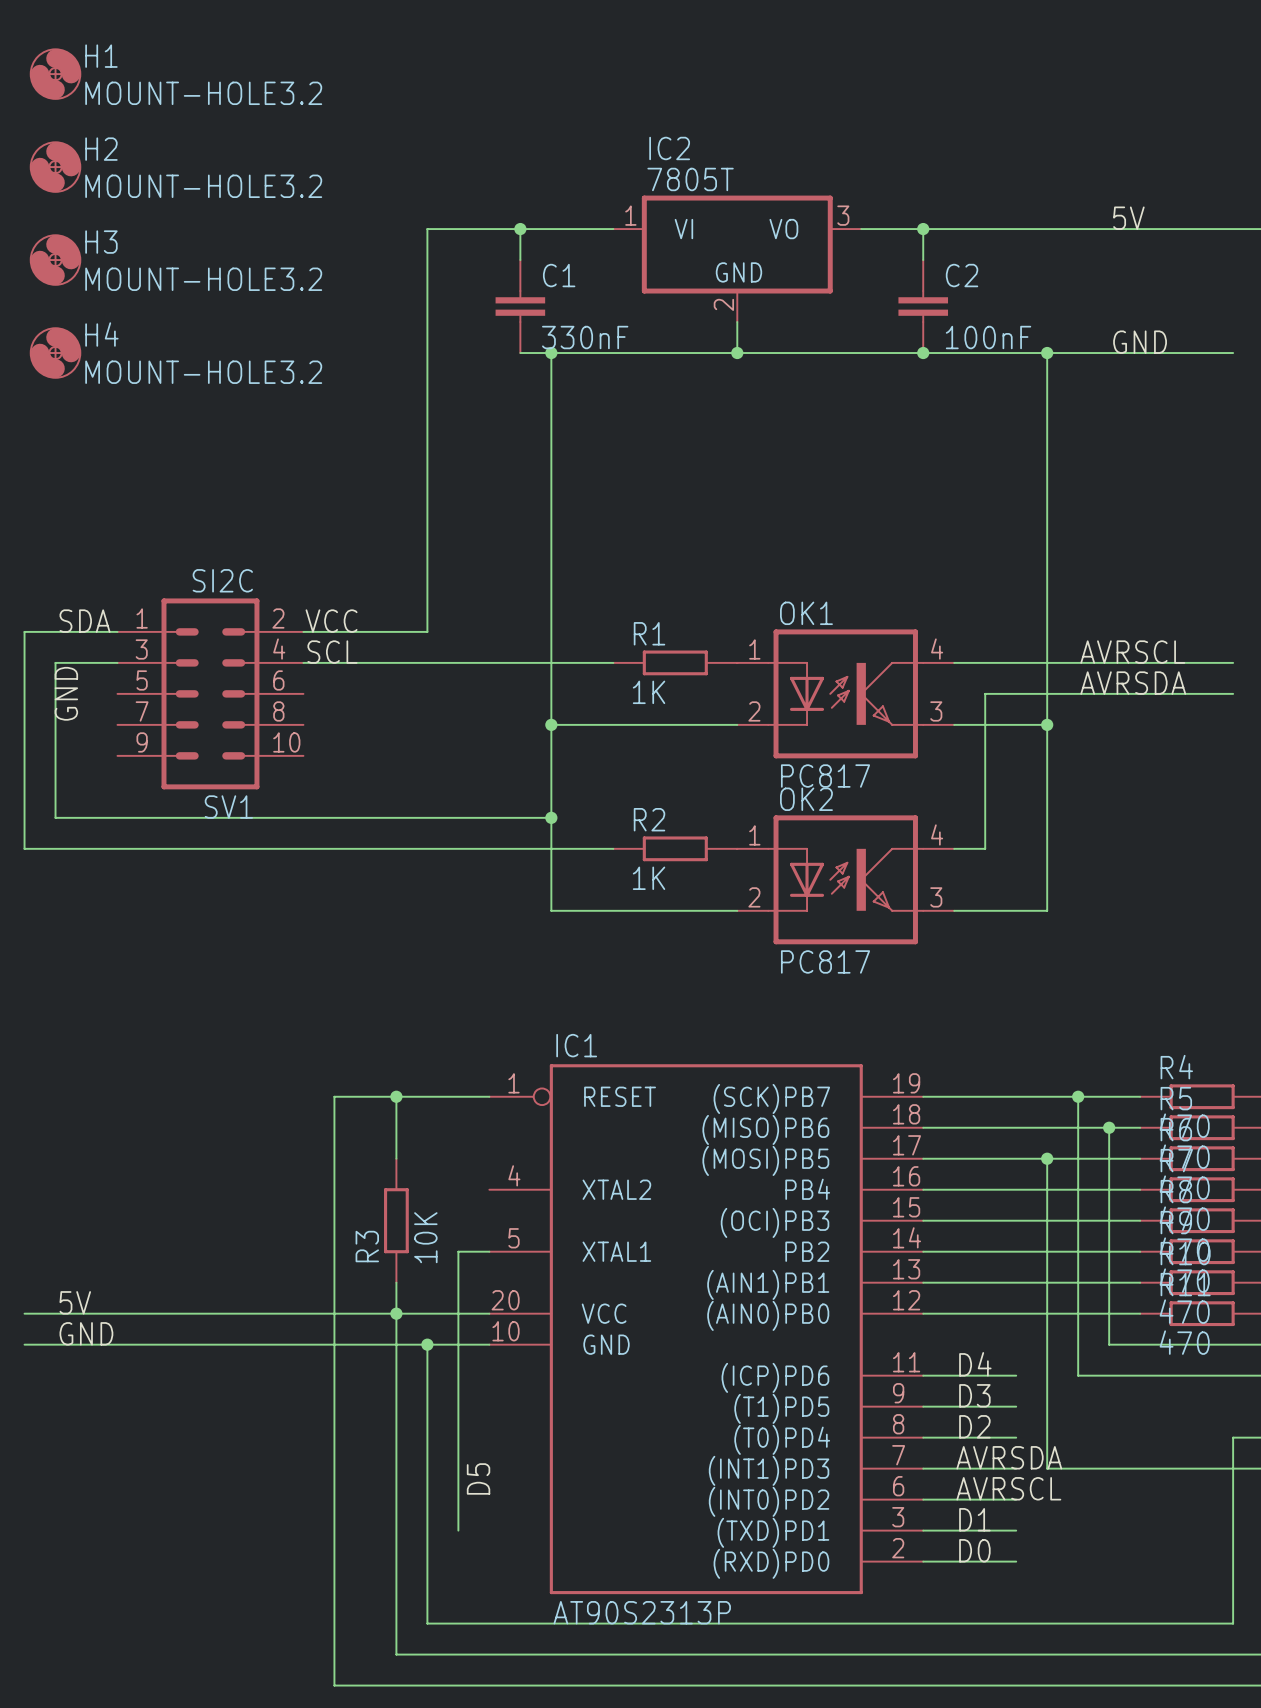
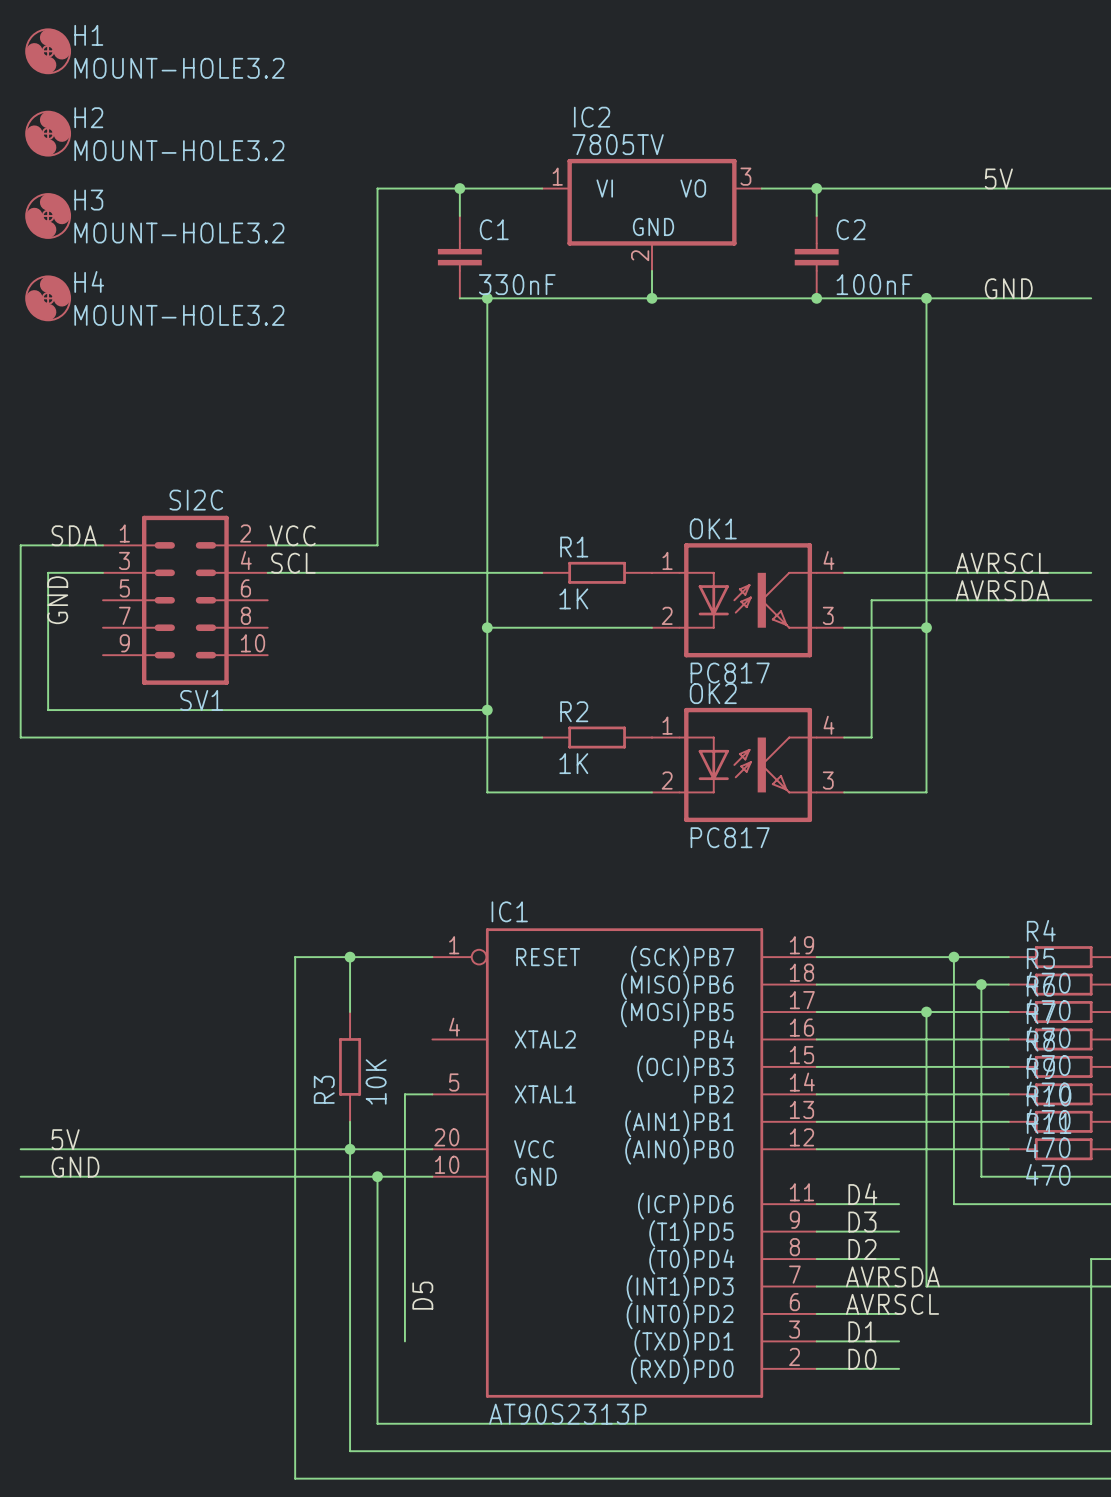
IC2 value: 7805T (690, 179) -> 7805TV (618, 144)

